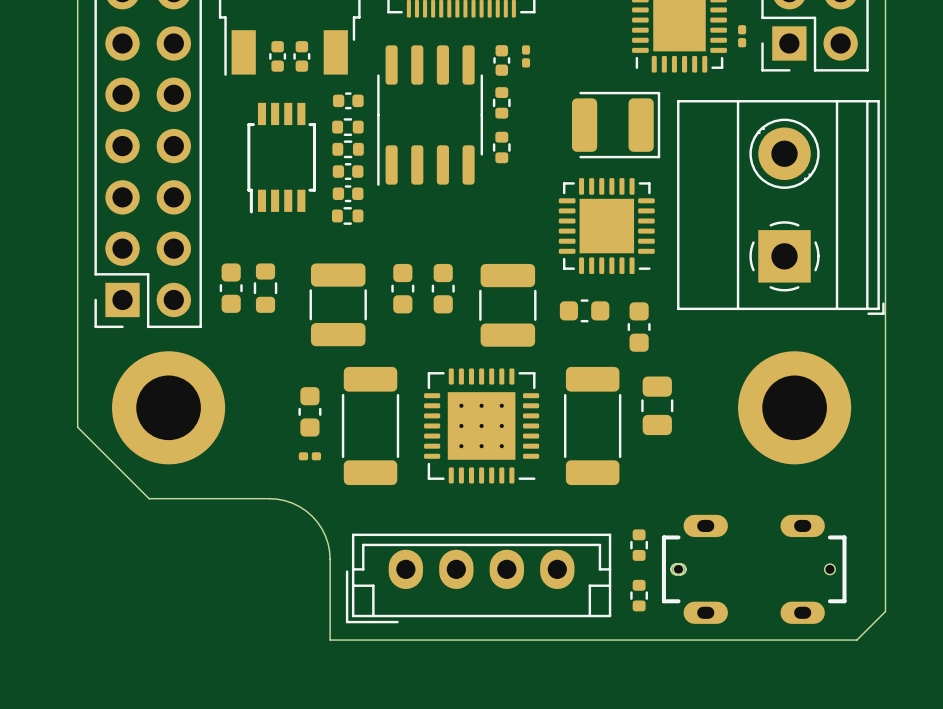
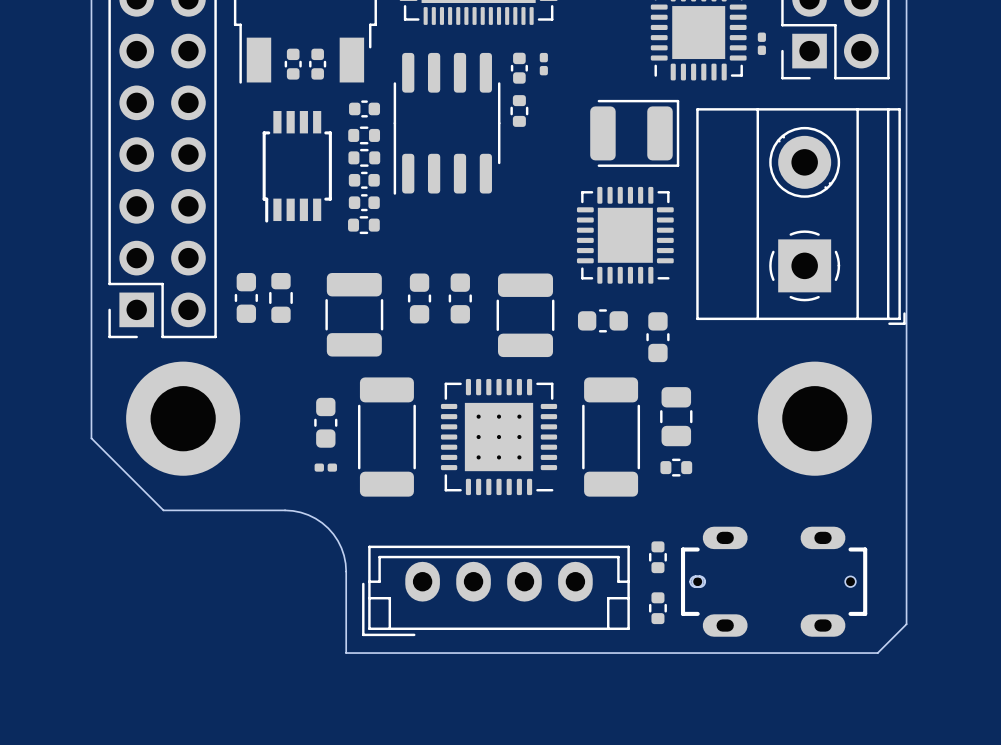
part rotation: 0° (501, 147) -> 90° clockwise (676, 467)
part position: (501, 147) -> (676, 467)

